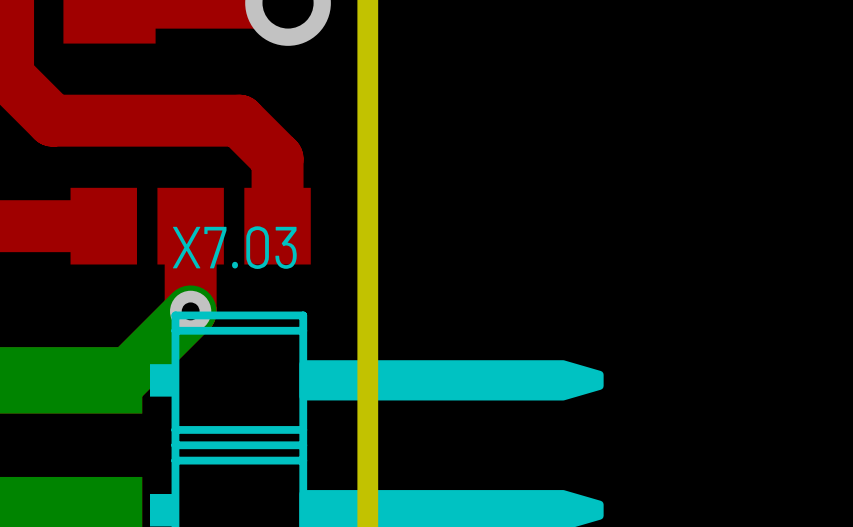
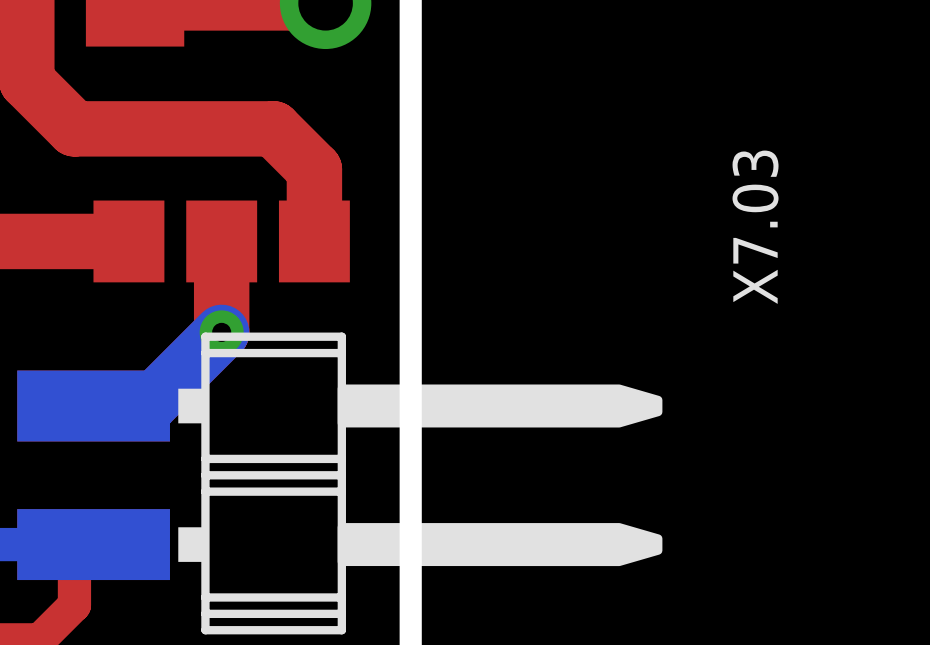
X7.03 name rotation: 0° (234, 247) -> 90° counterclockwise (755, 227)
X7.03 name position: X7.03 (234, 247) -> X7.03 (755, 227)

